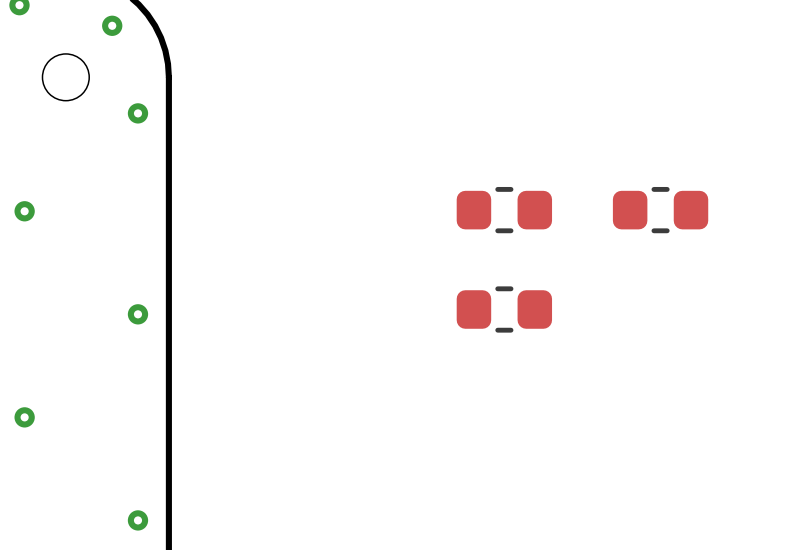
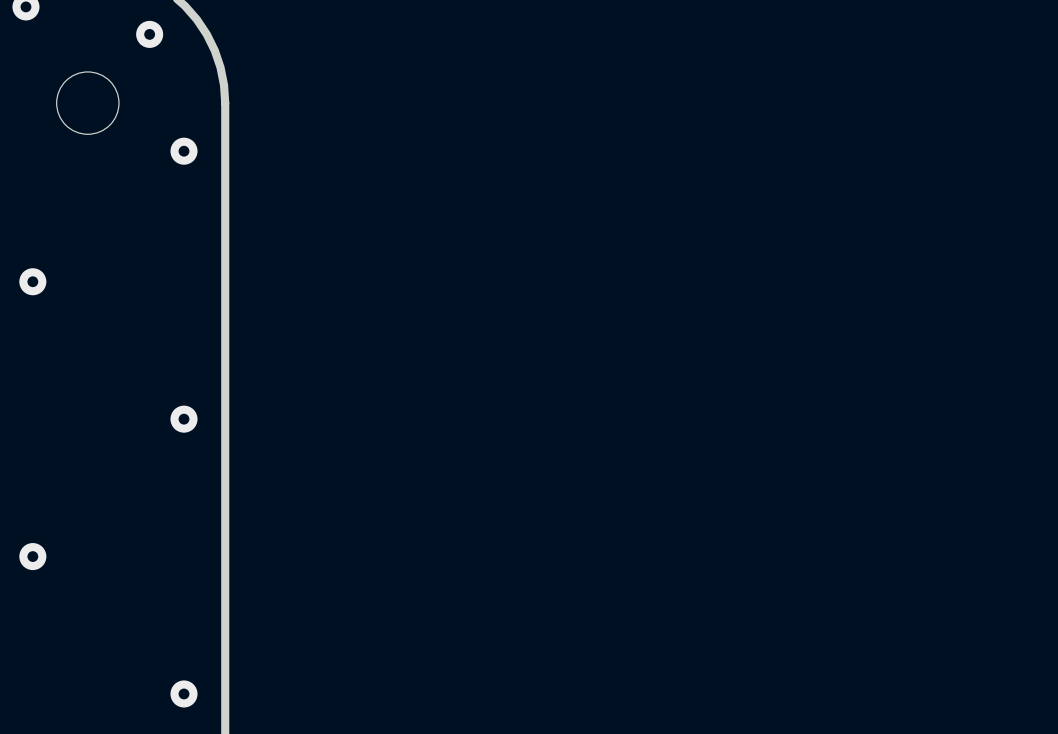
part: (504, 210) -> none
part: (660, 210) -> none
part: (504, 309) -> none

